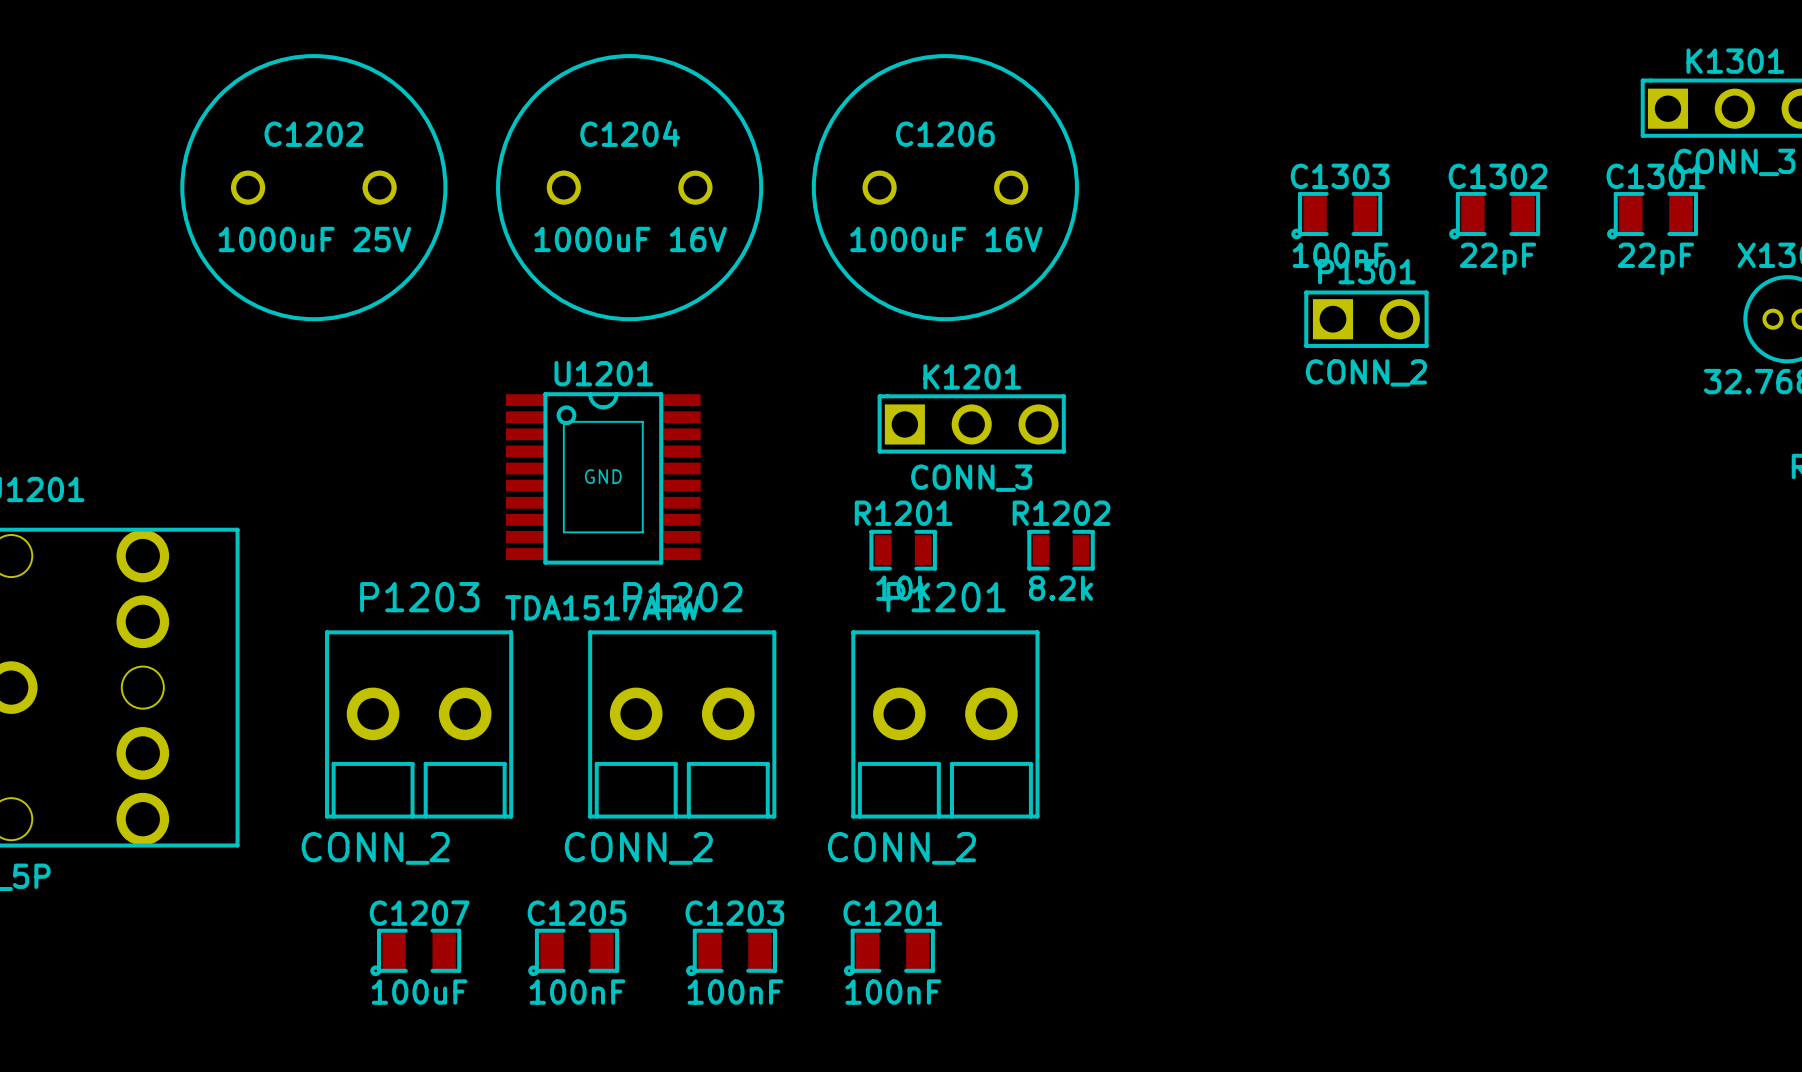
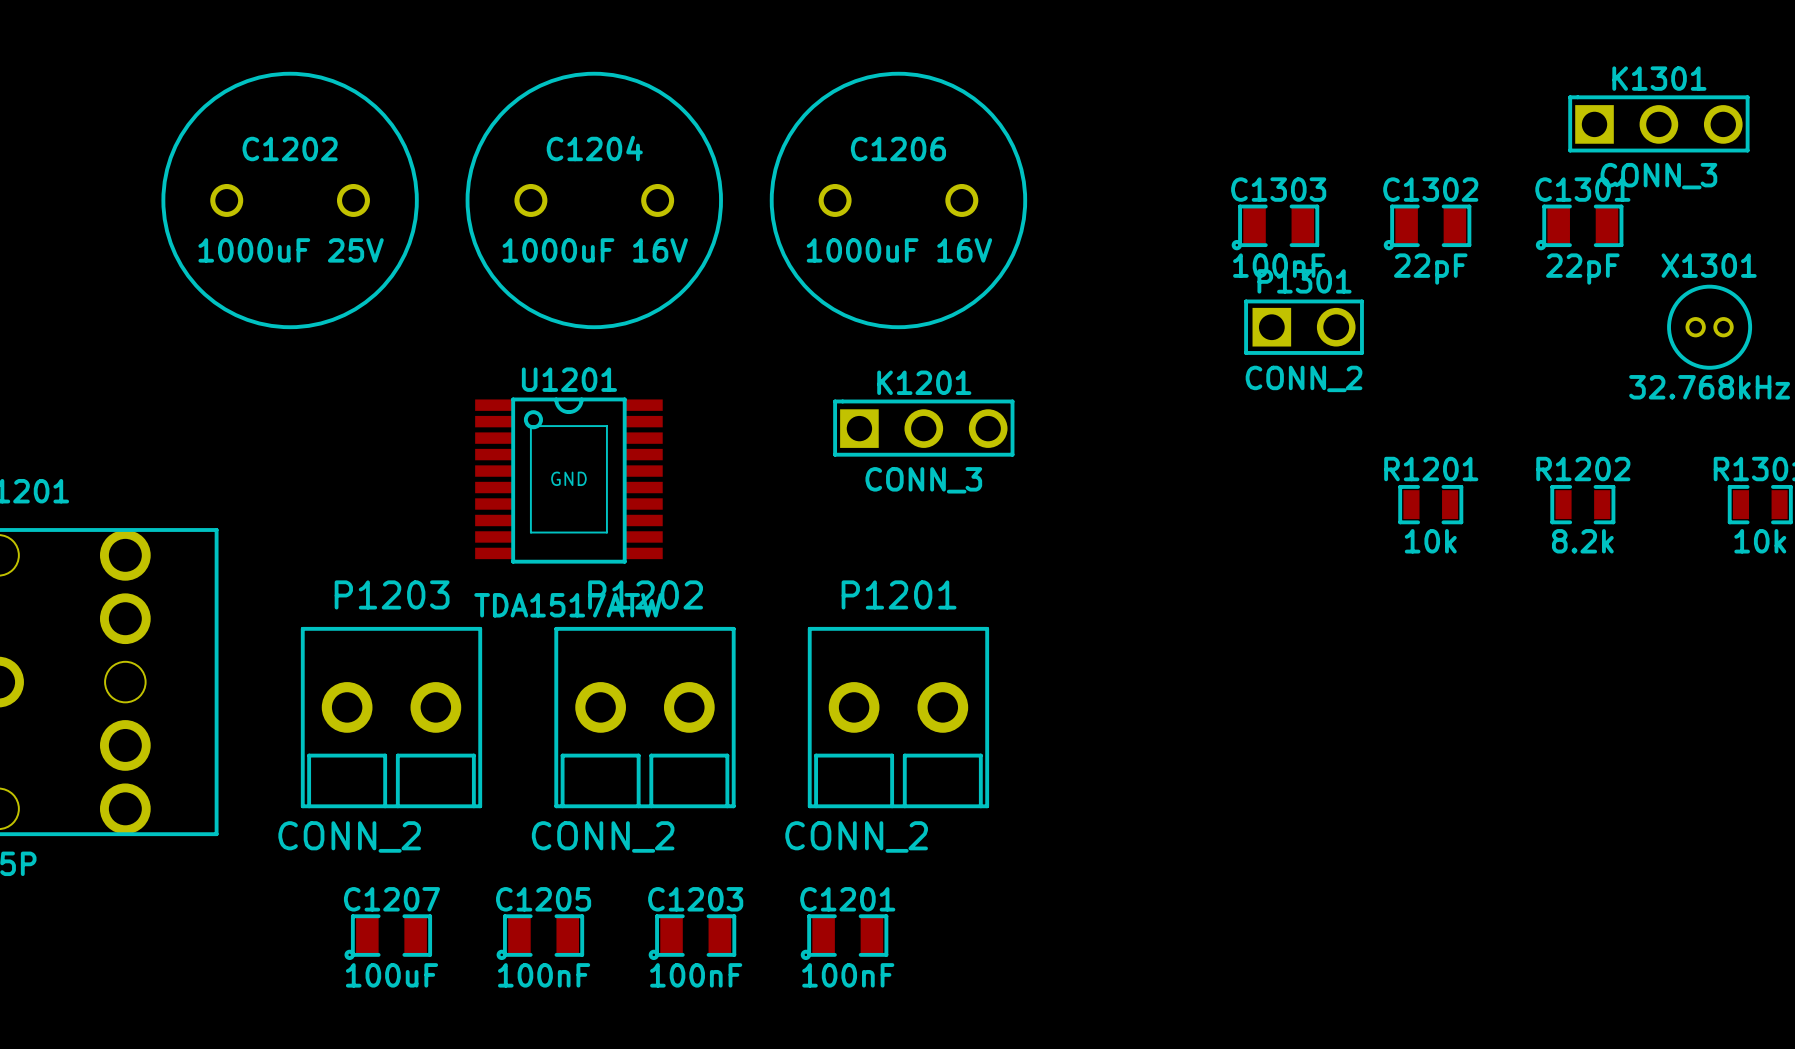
R1201 position: (903, 550) -> (1430, 504)
R1202 position: (1061, 550) -> (1582, 504)

